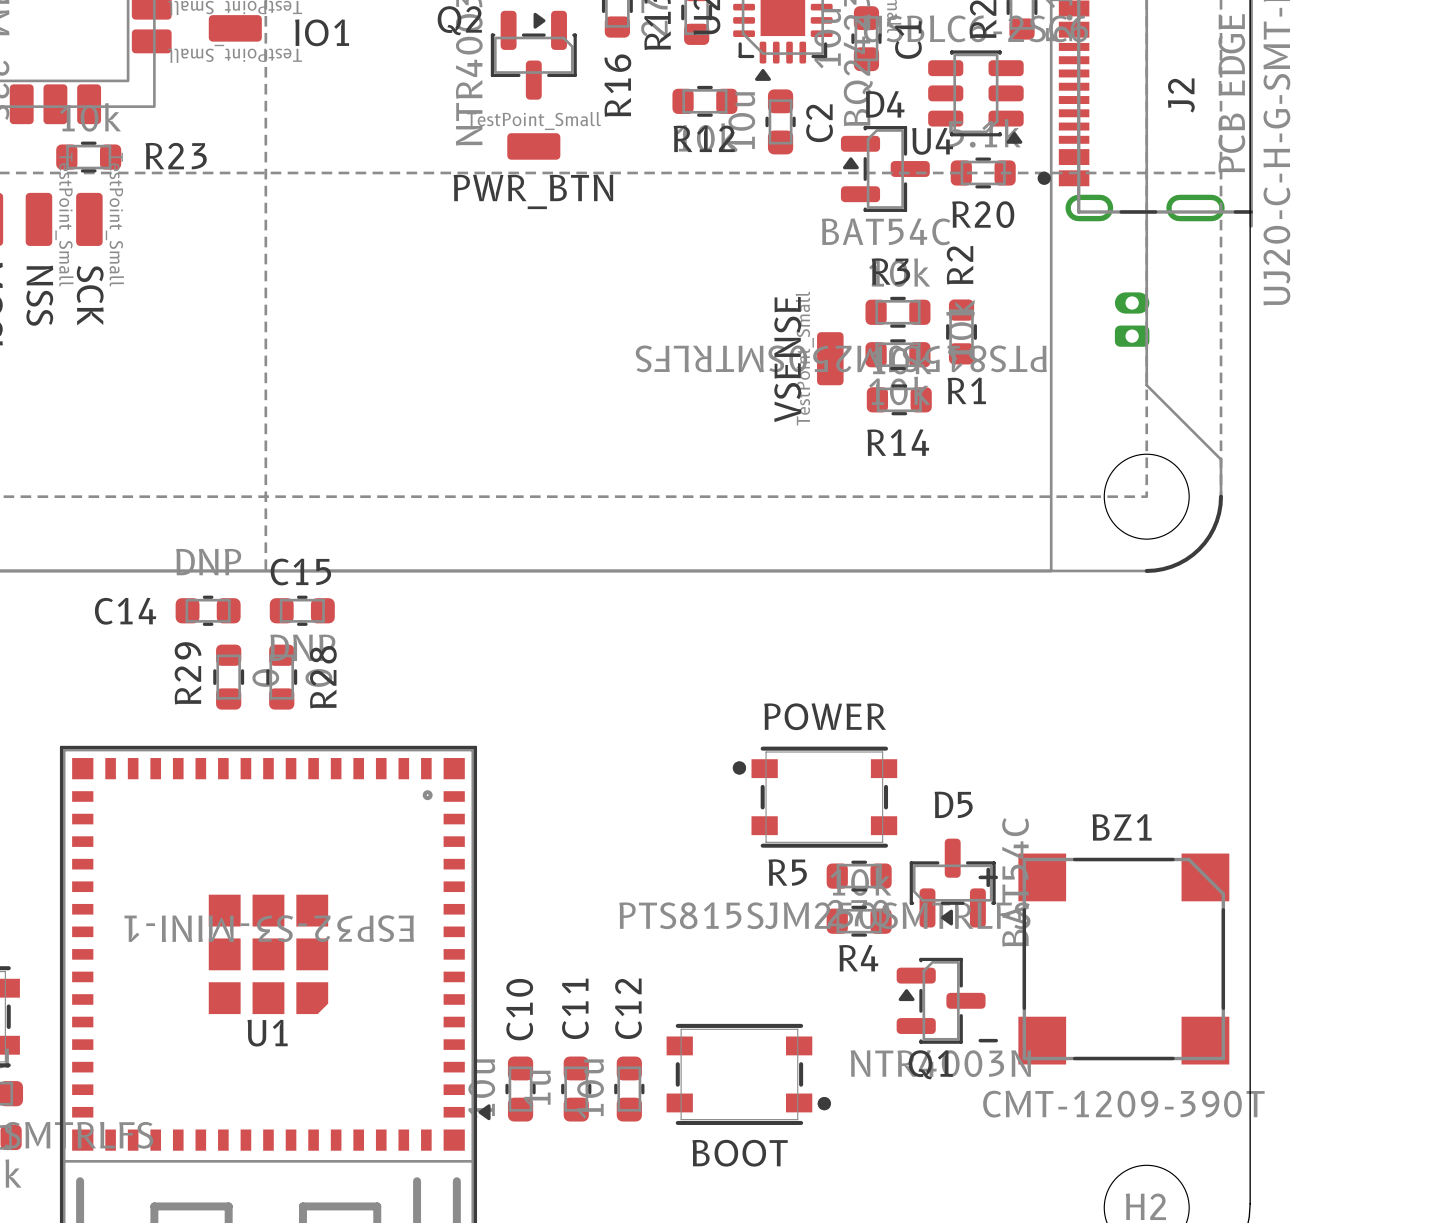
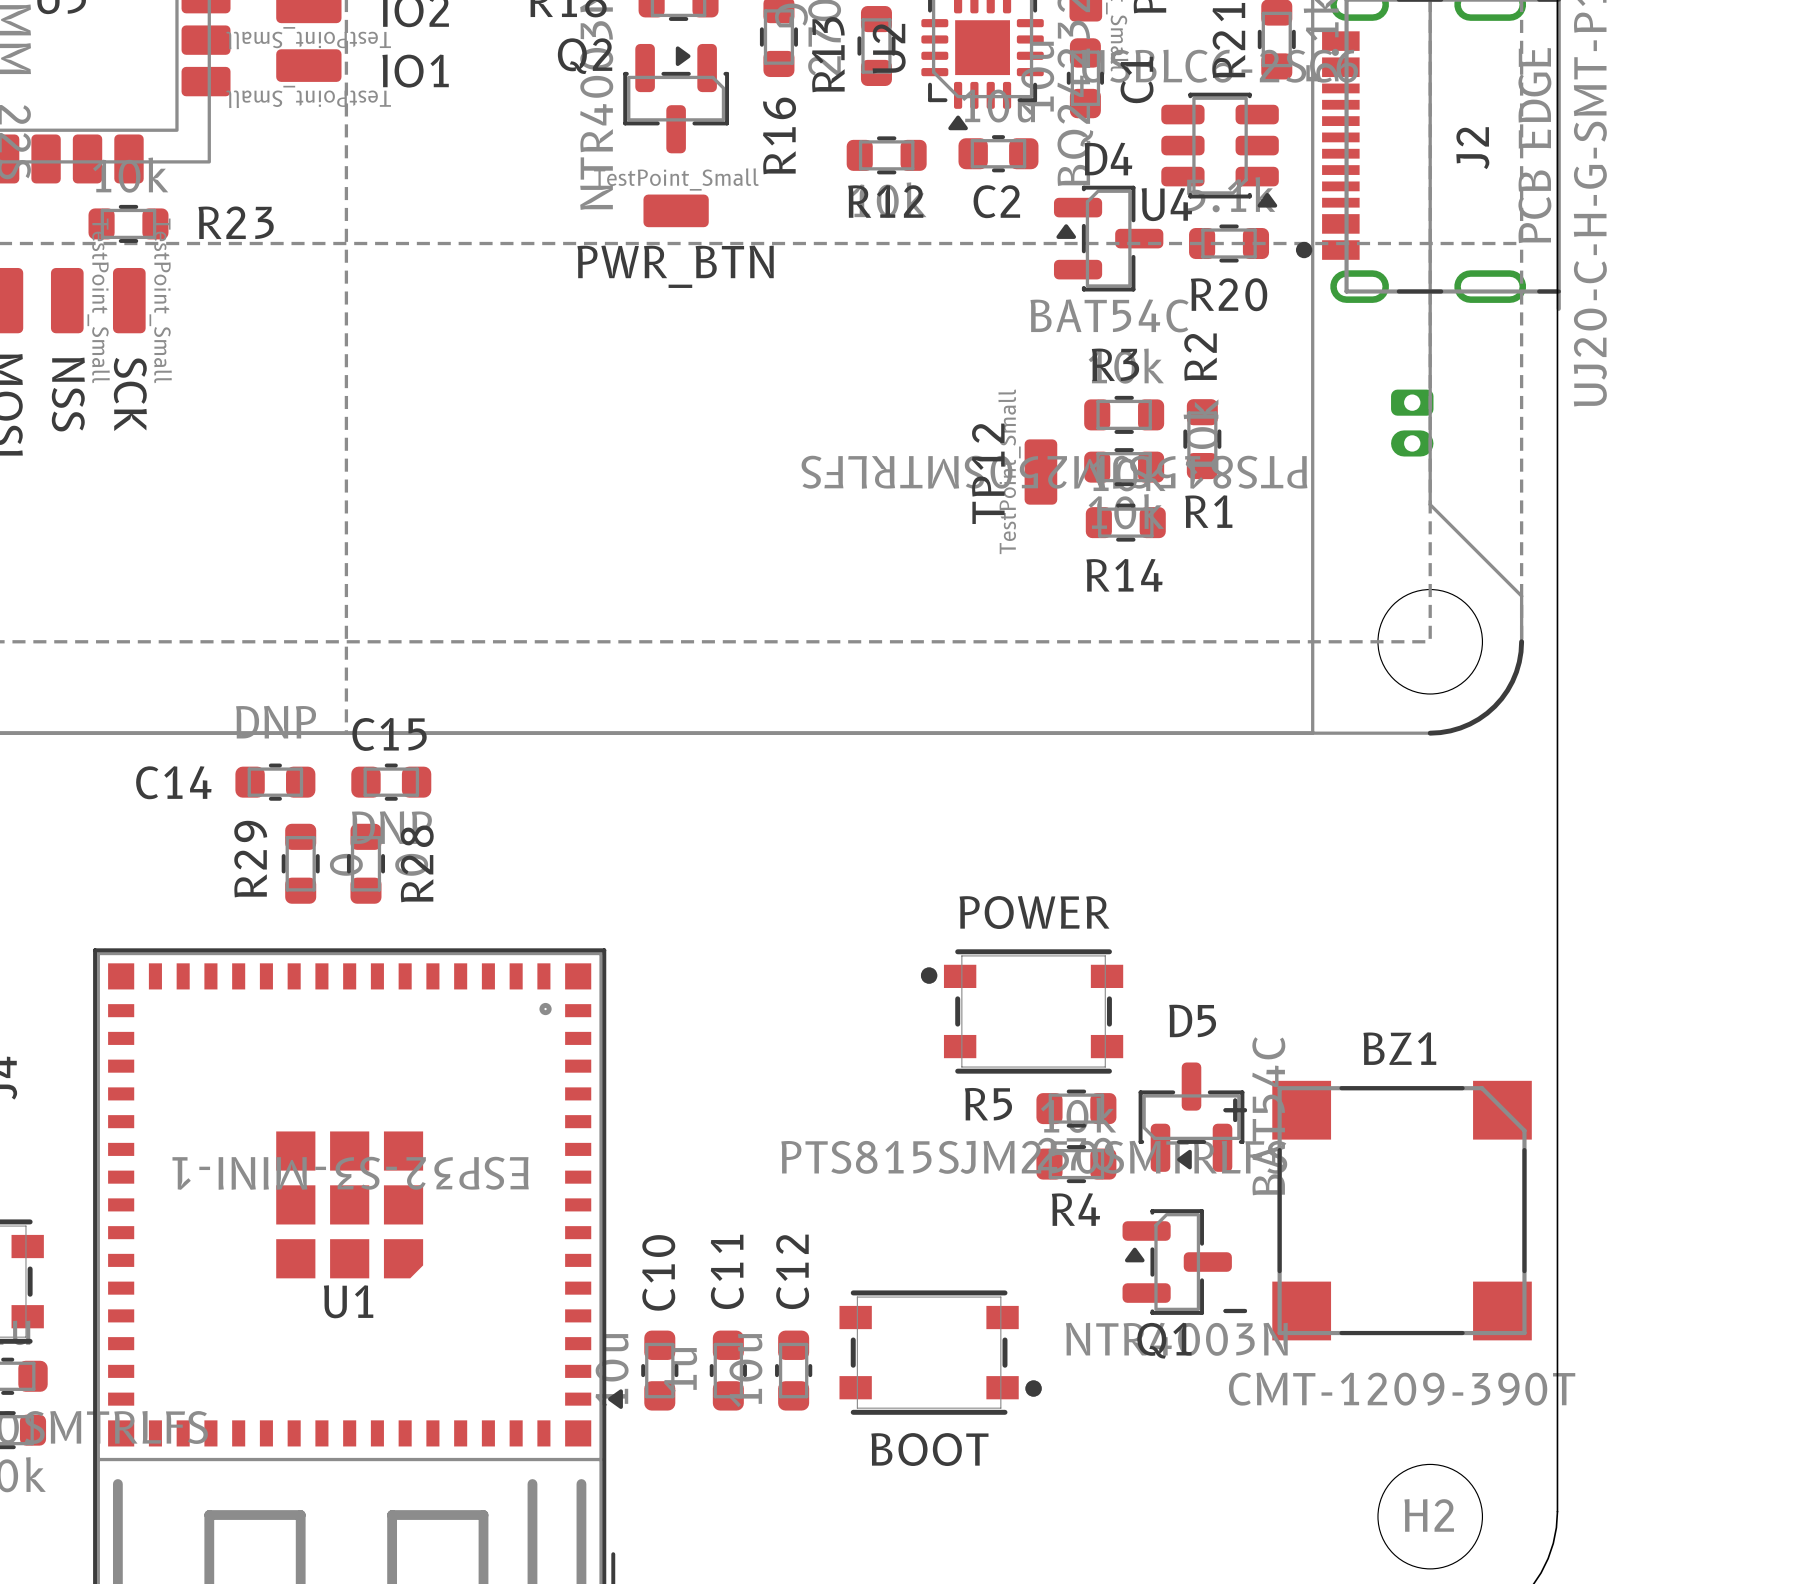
C2 rotation: 0° (780, 121) -> 90° clockwise (998, 153)
part rotation: 0° (1132, 319) -> 180° (1412, 423)
VSENSE name: VSENSE (787, 359) -> TP12 (988, 473)

